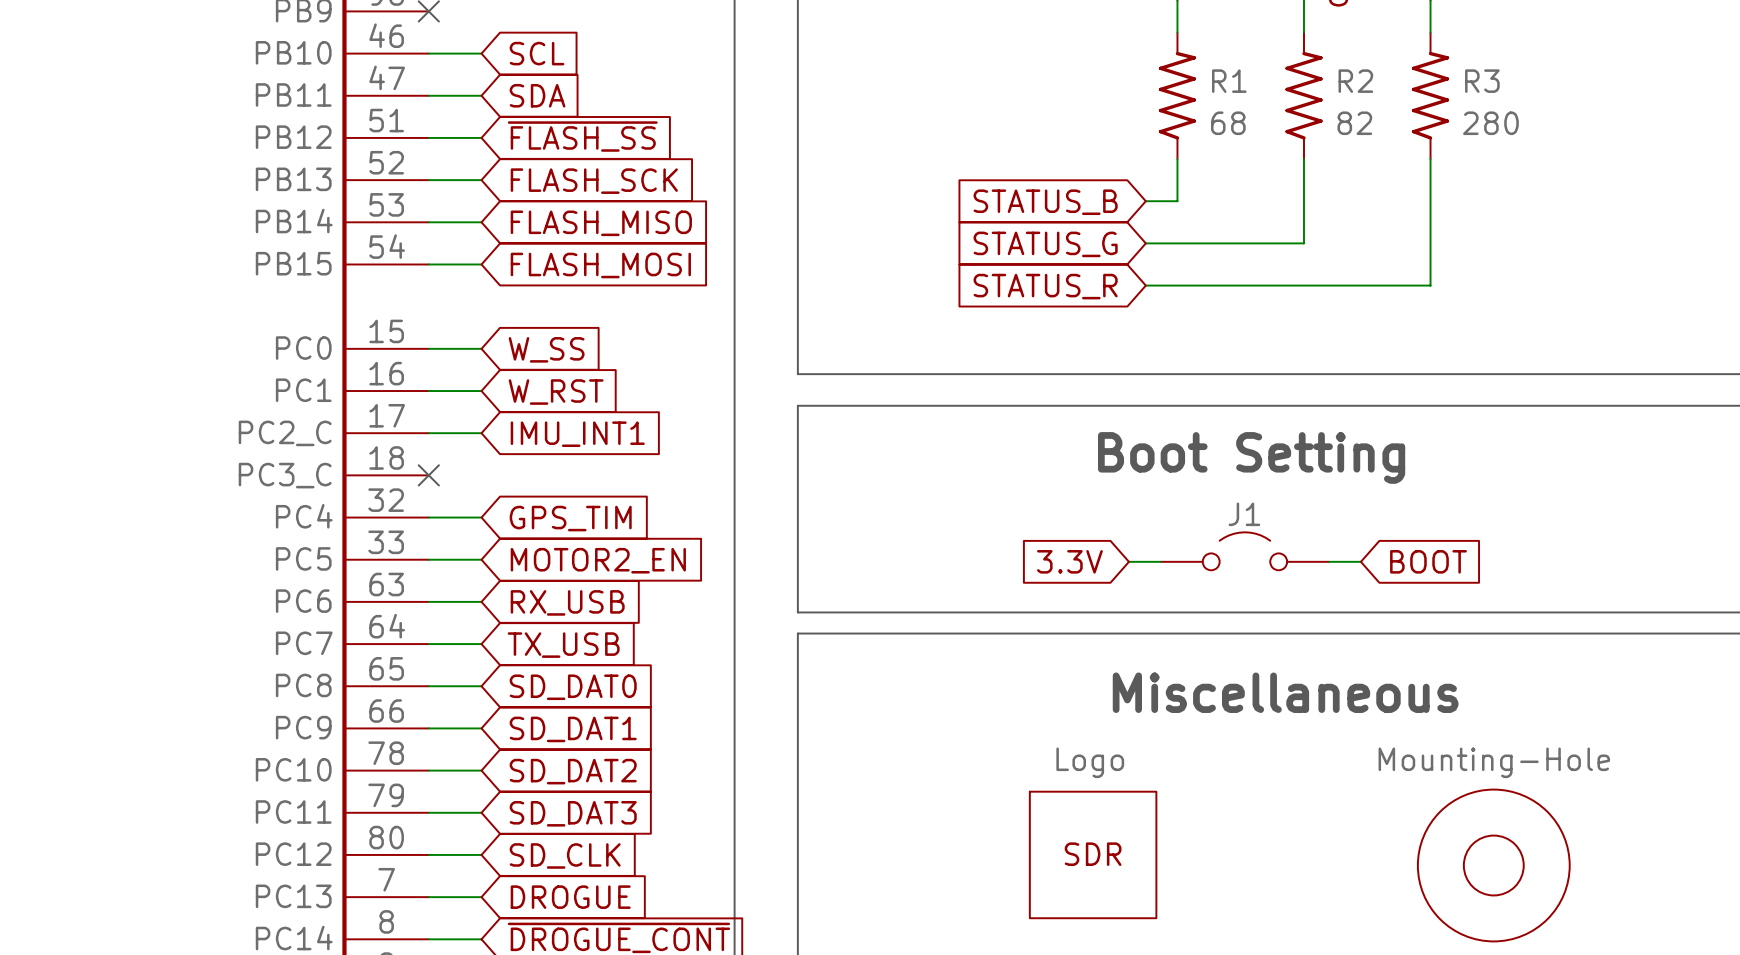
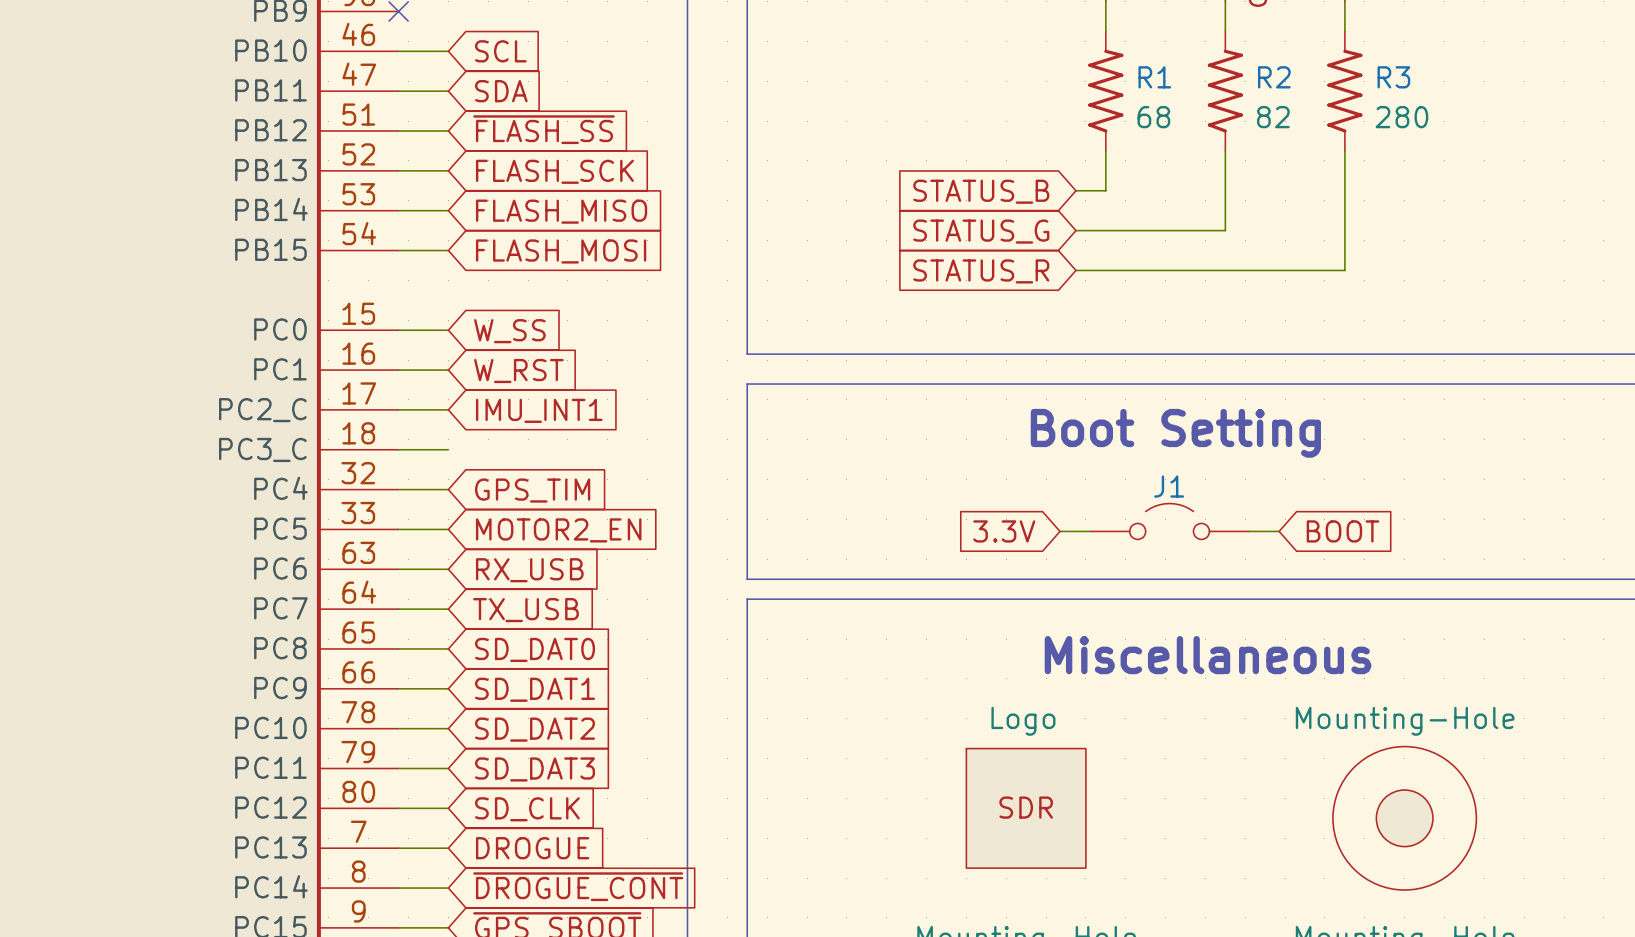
wire: none -> (398, 449) (448, 449)
no-connect mark: (428, 475) -> none

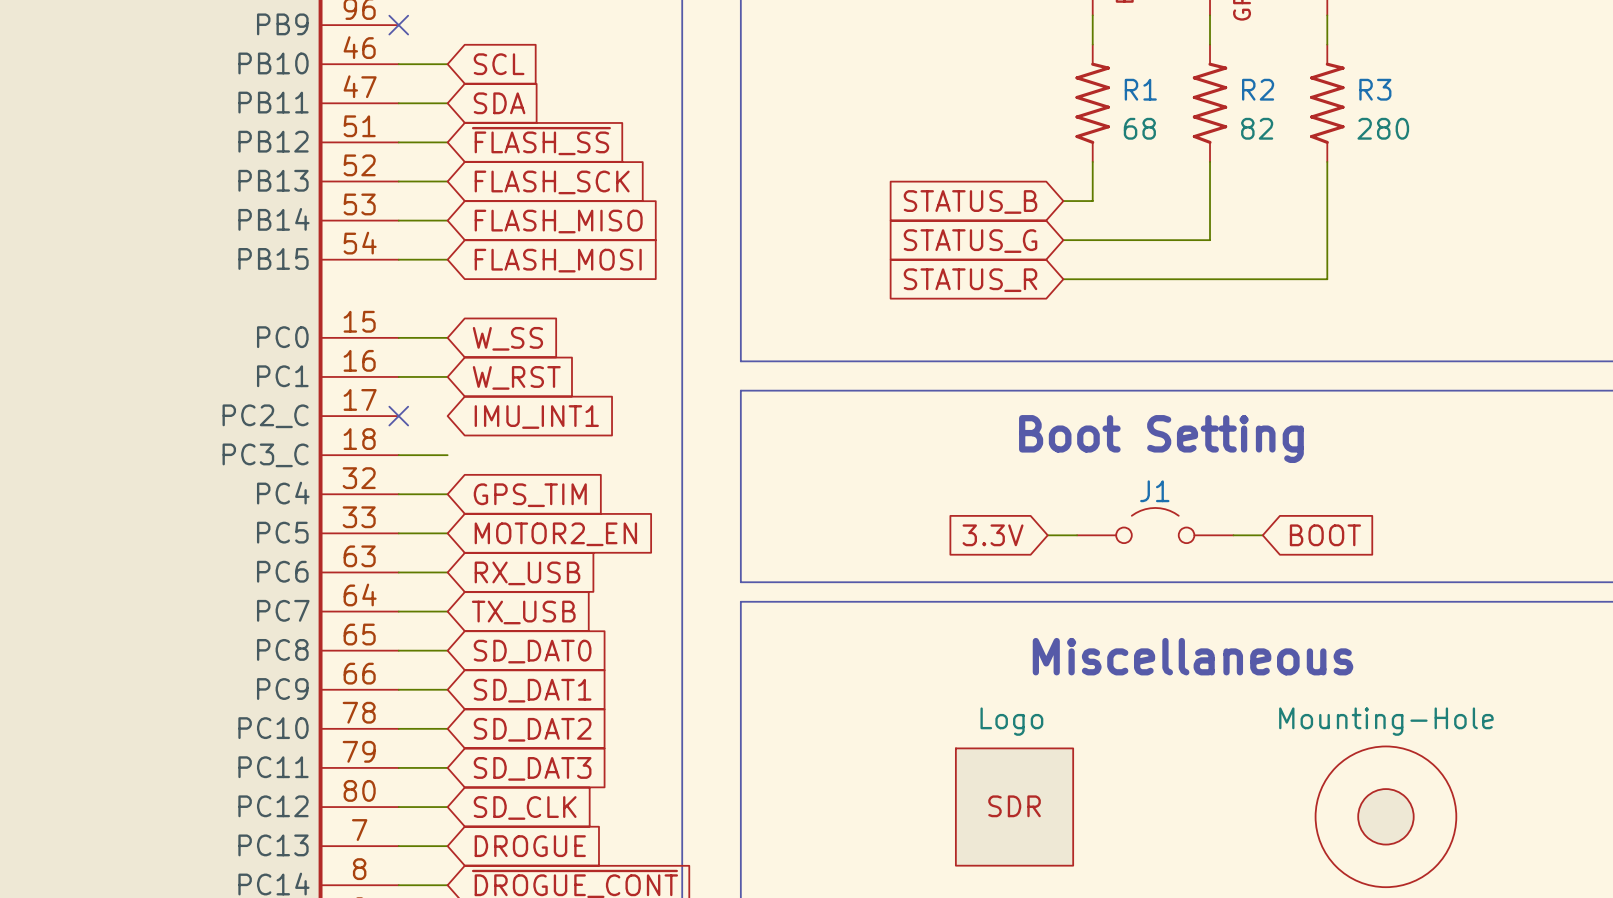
wire: (398, 409) (448, 409) -> none
no-connect mark: none -> (398, 416)

